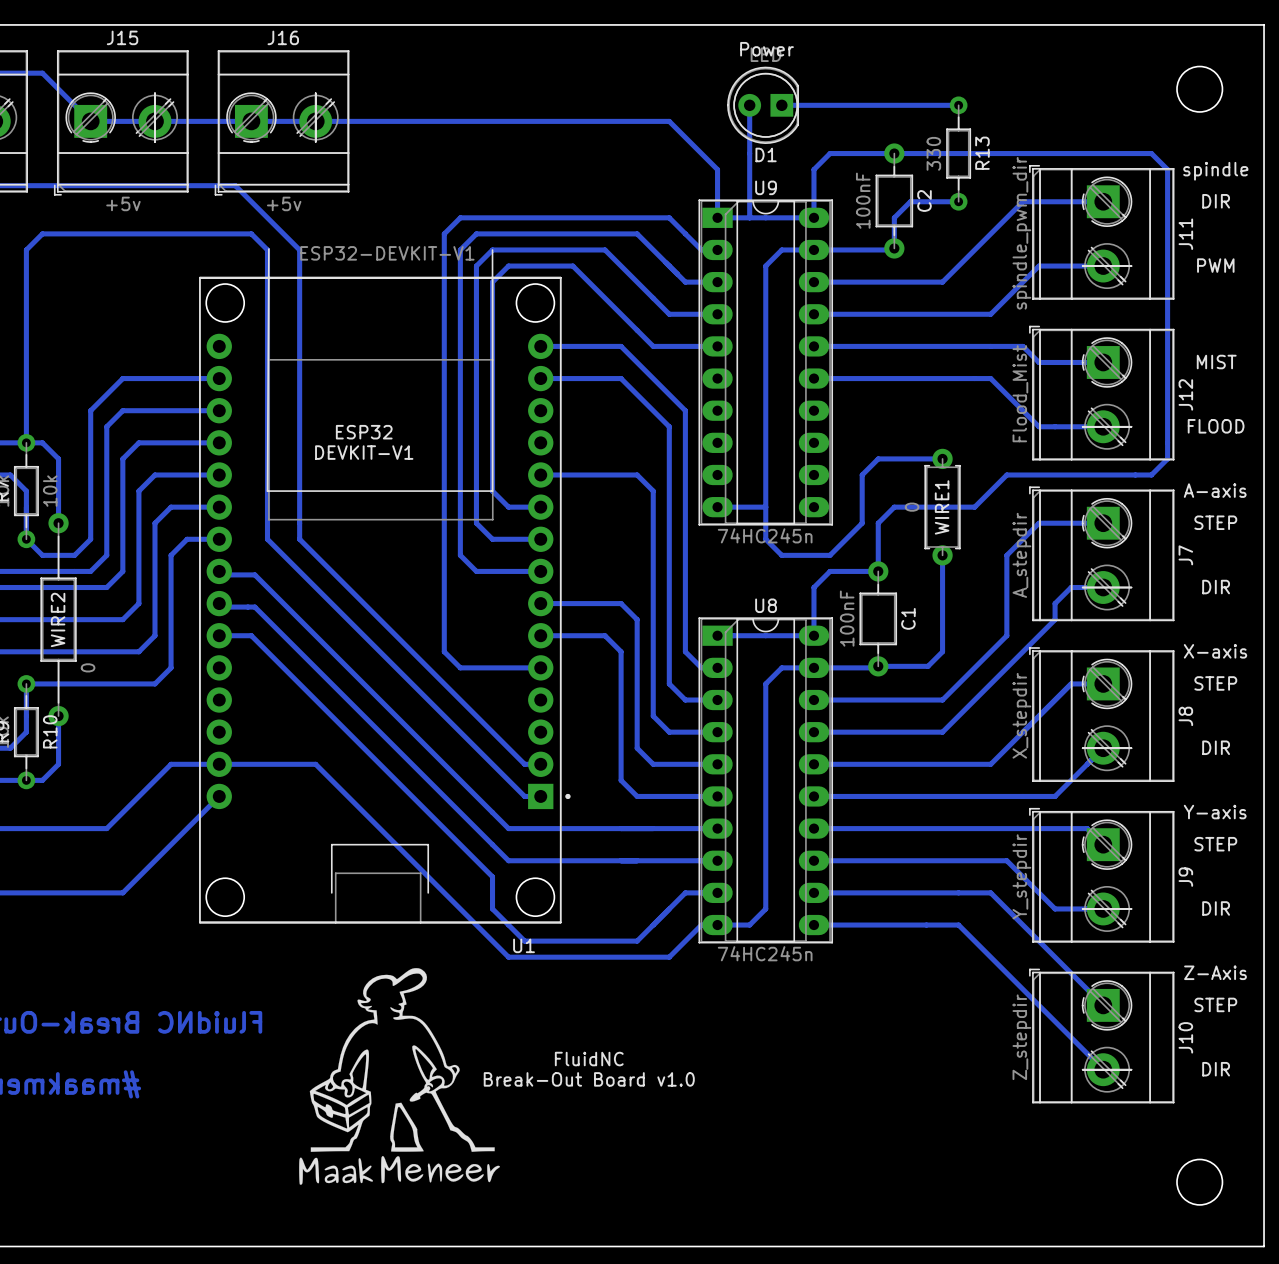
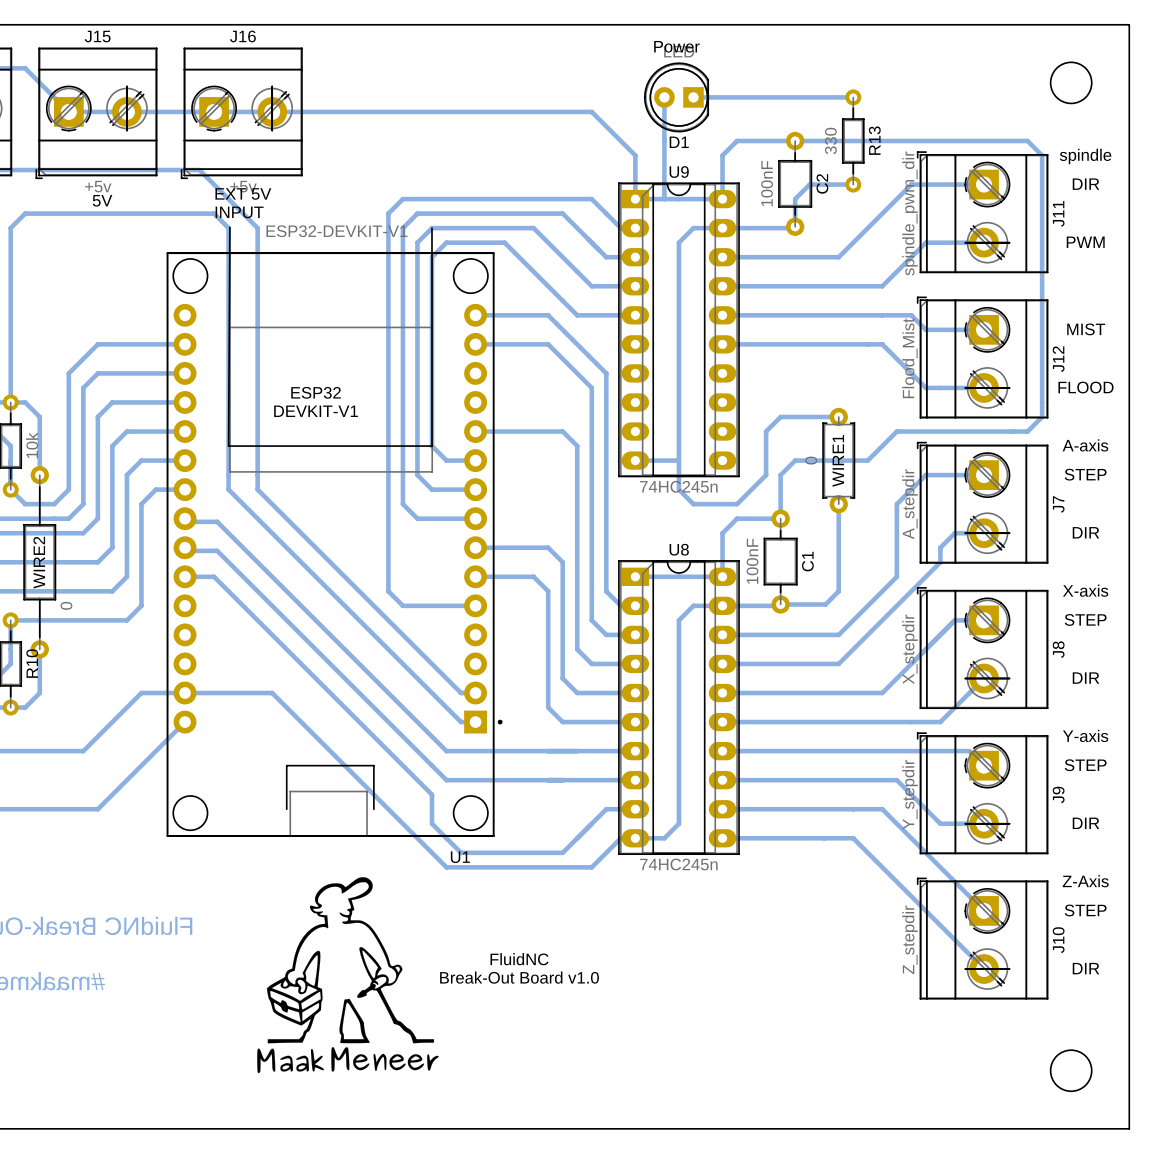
text: none -> EXT 5V (243, 193)
text: none -> 5V (102, 200)
text: none -> INPUT (239, 212)

